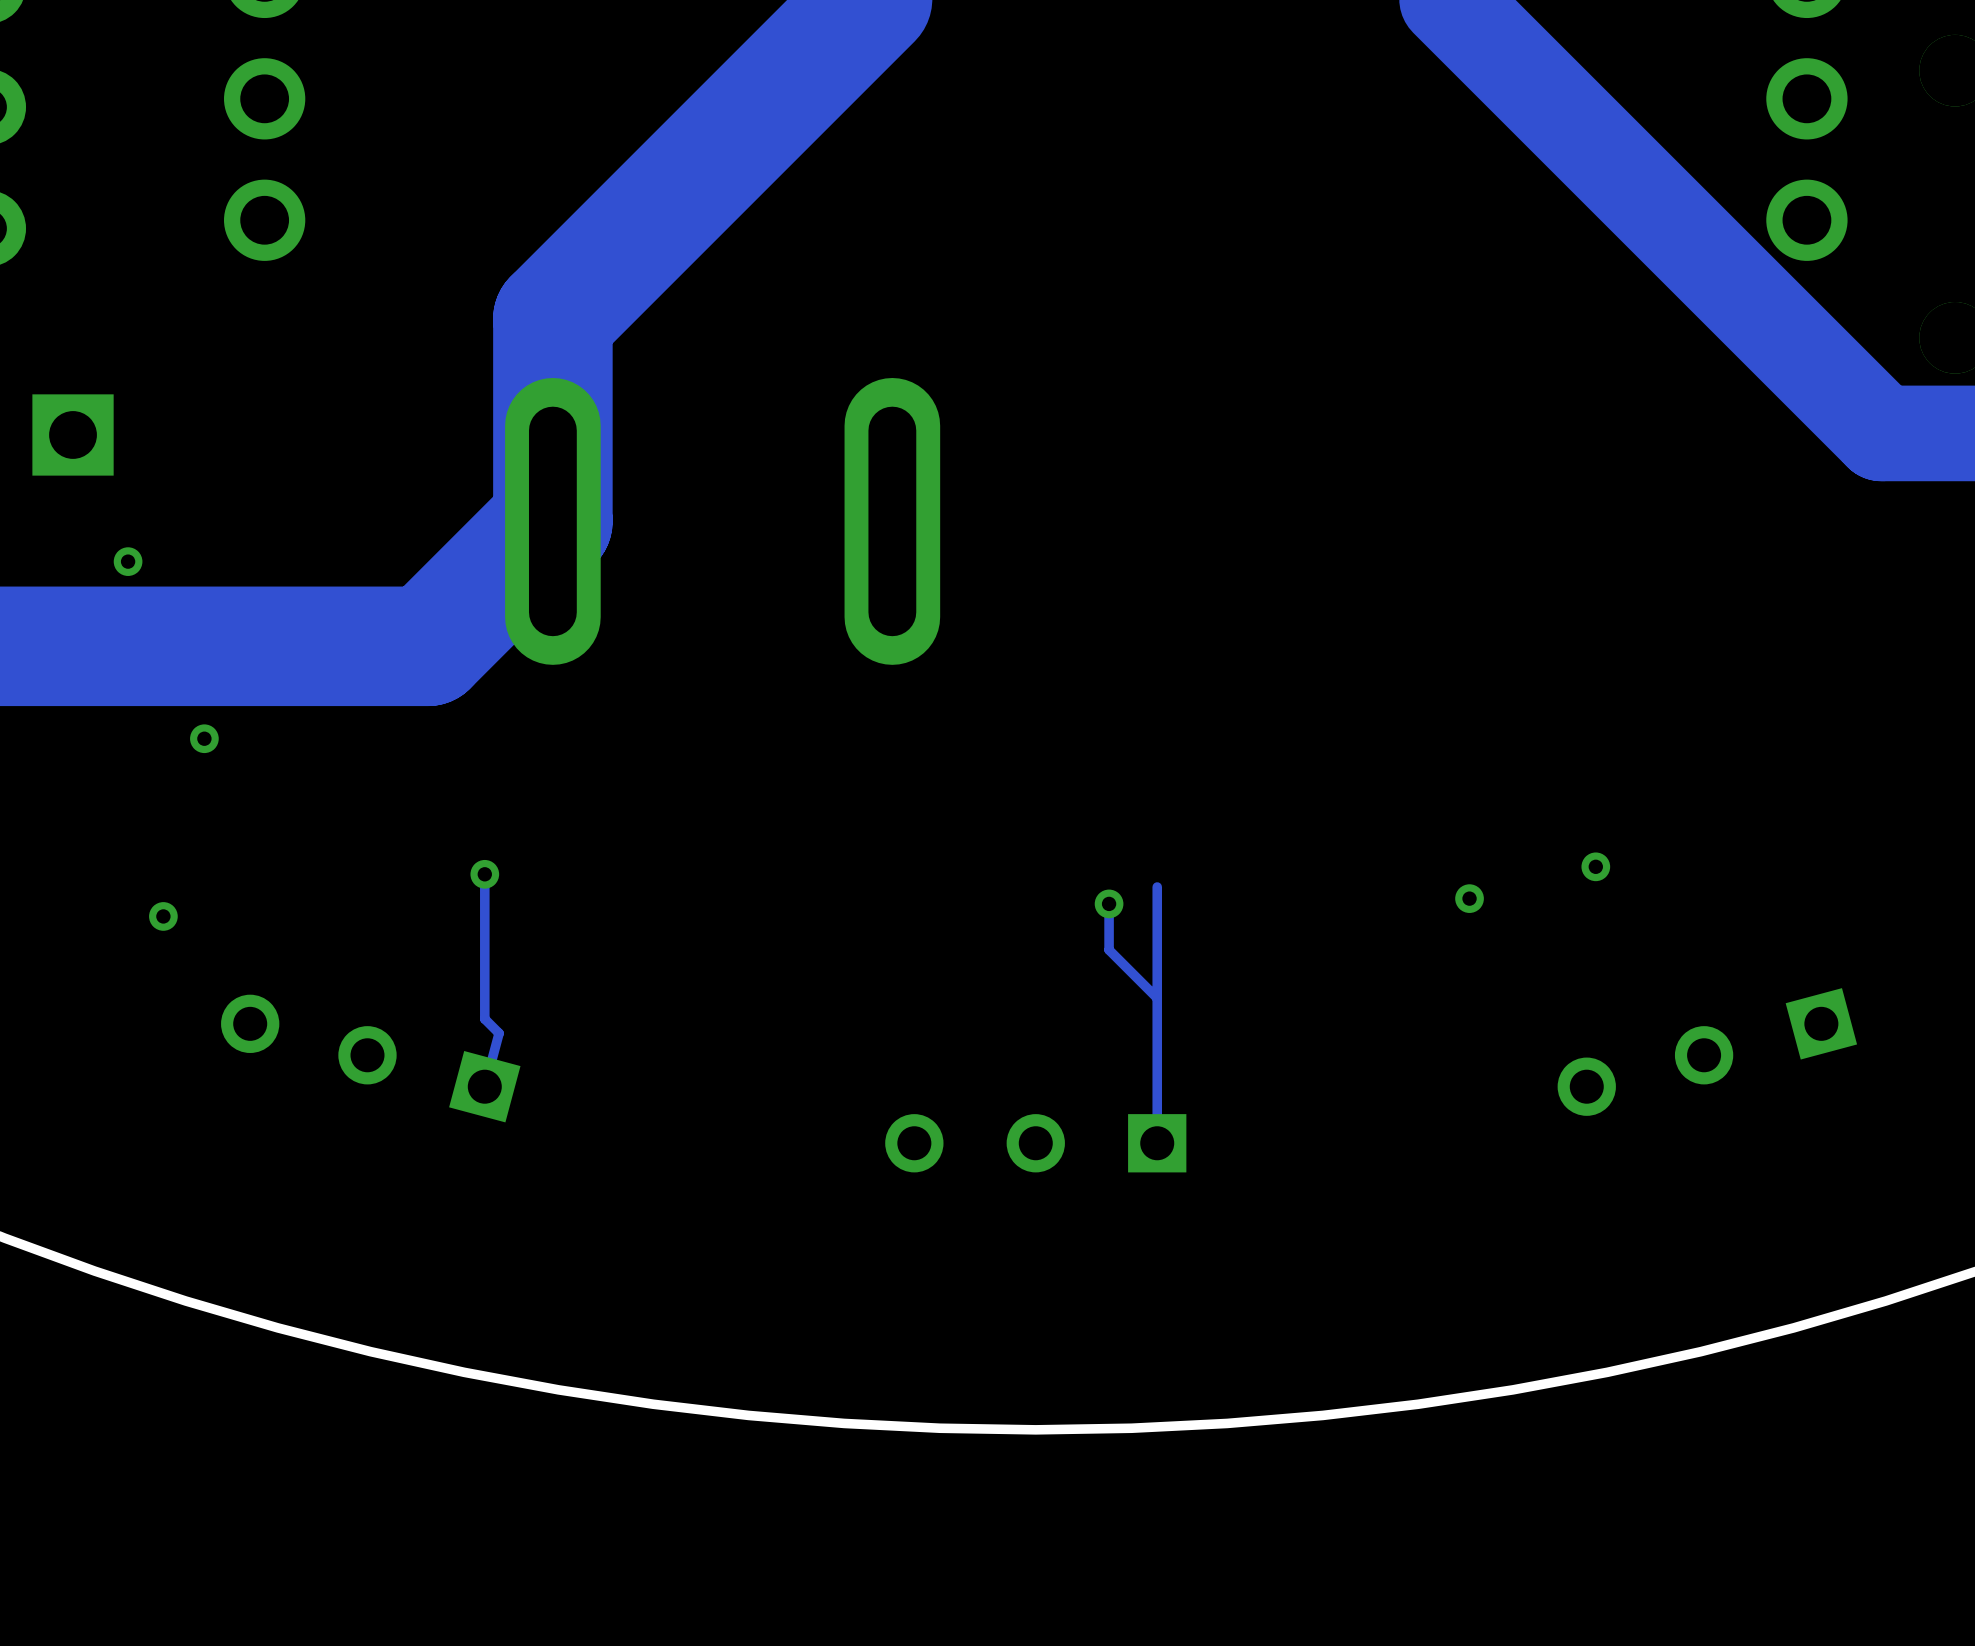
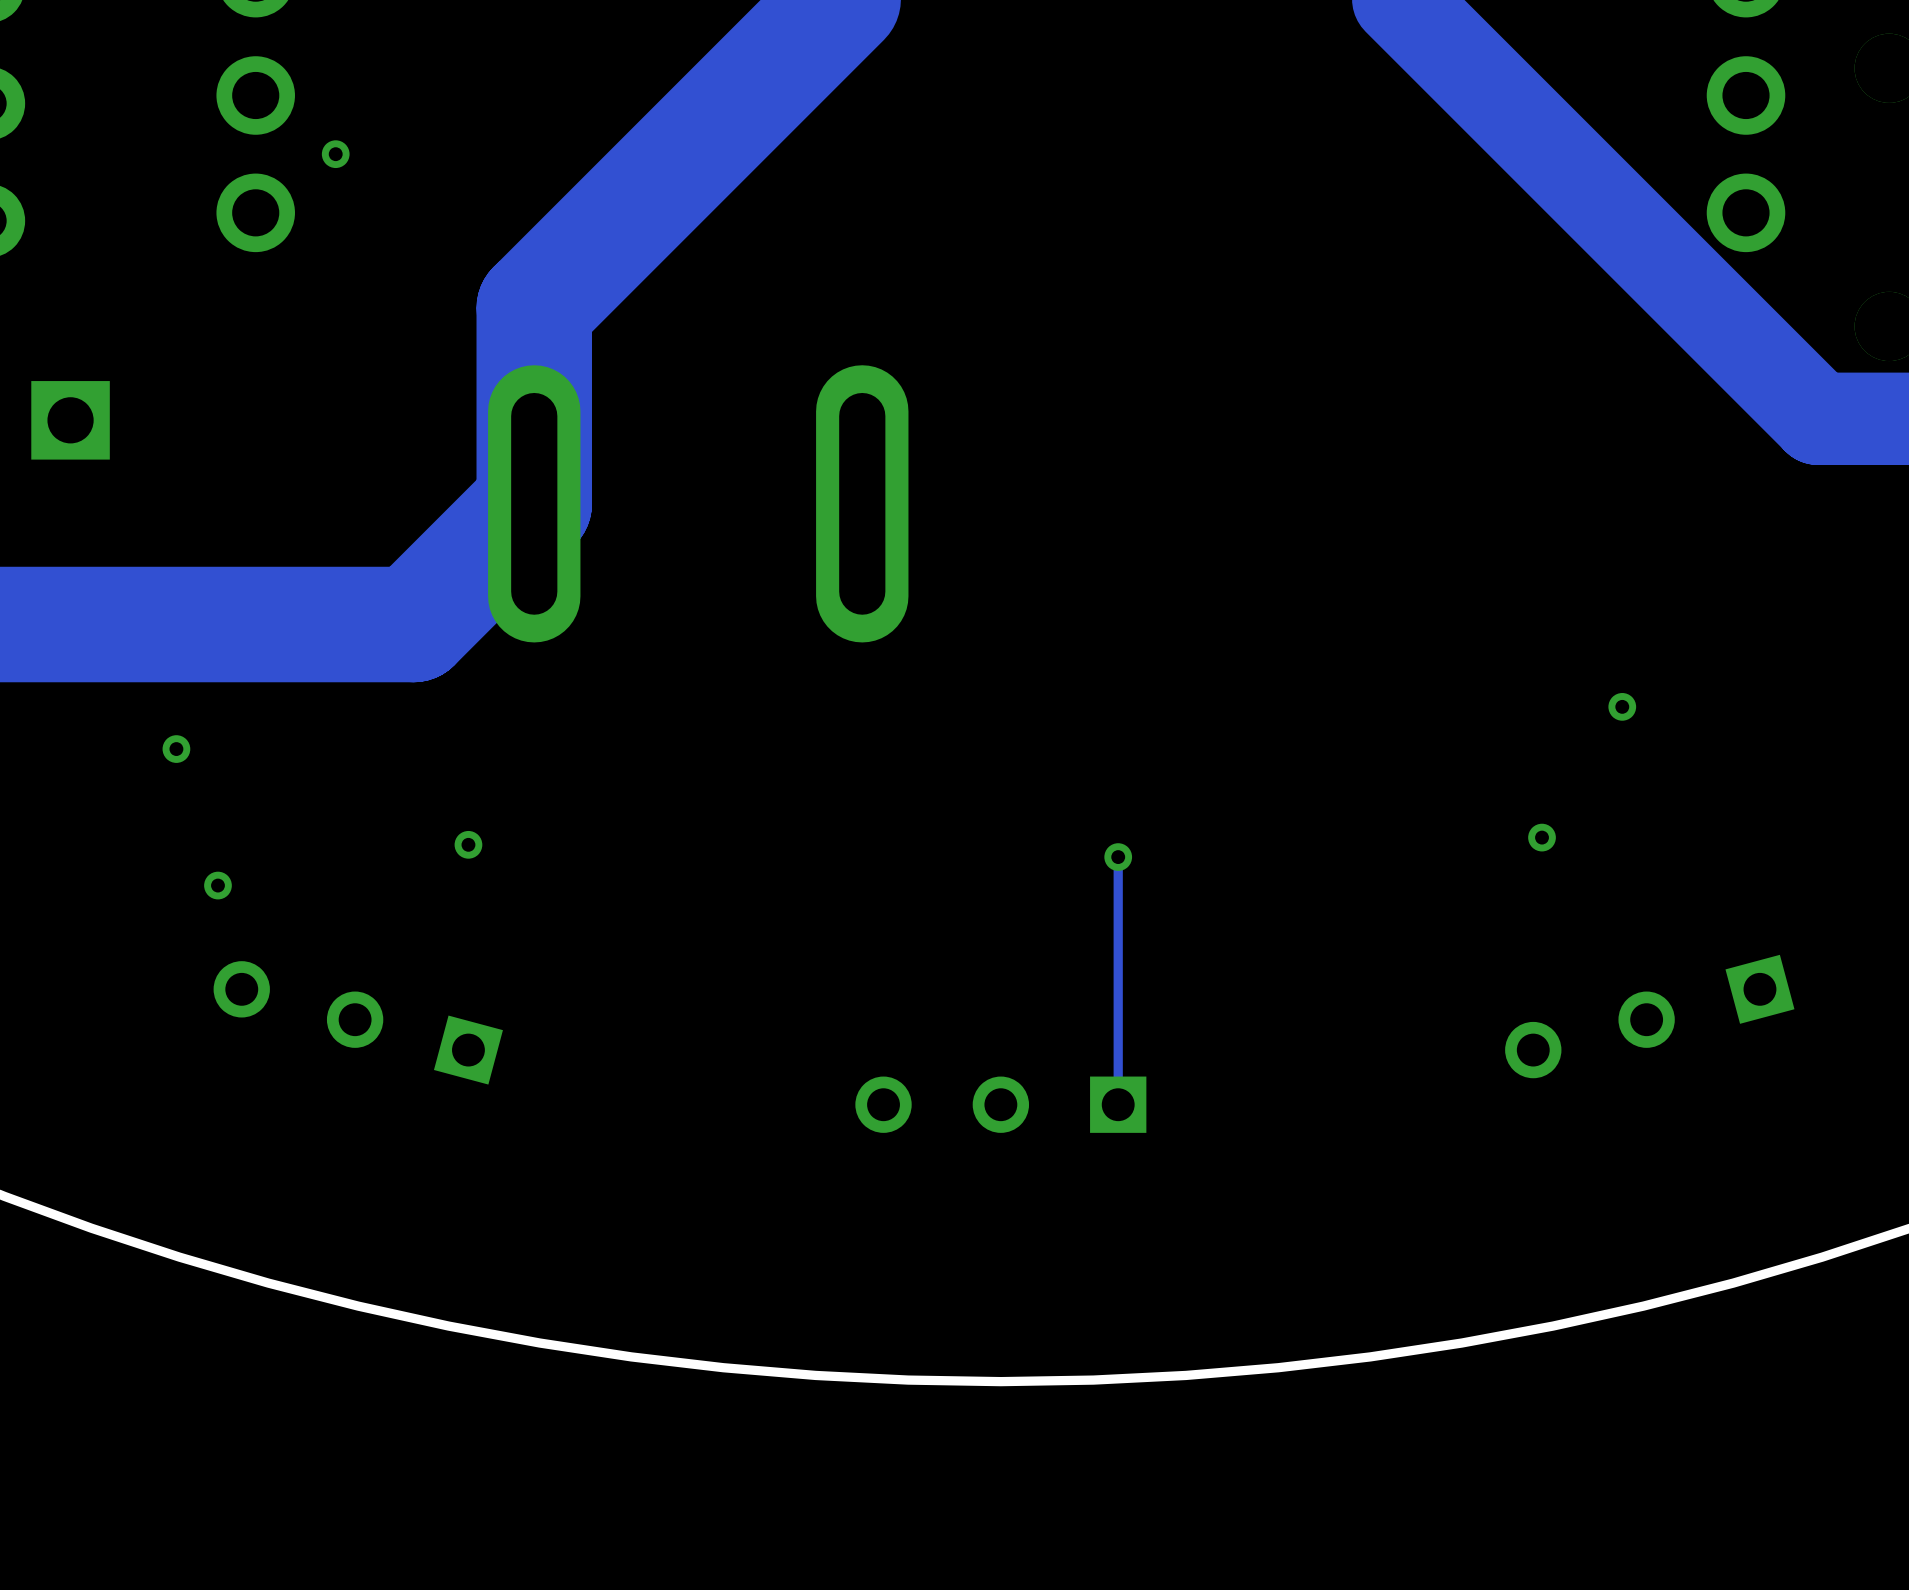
via: none -> (335, 154)
via: (128, 561) -> none
via: none -> (1622, 706)
via position: (204, 738) -> (176, 749)
track: (484, 874) (484, 1019) (499, 1033) (484, 1086) -> none
via: (1469, 898) -> none
track: (1109, 903) (1109, 950) (1157, 998) -> none
via position: (1109, 903) -> (1118, 857)
via position: (163, 916) -> (217, 885)

